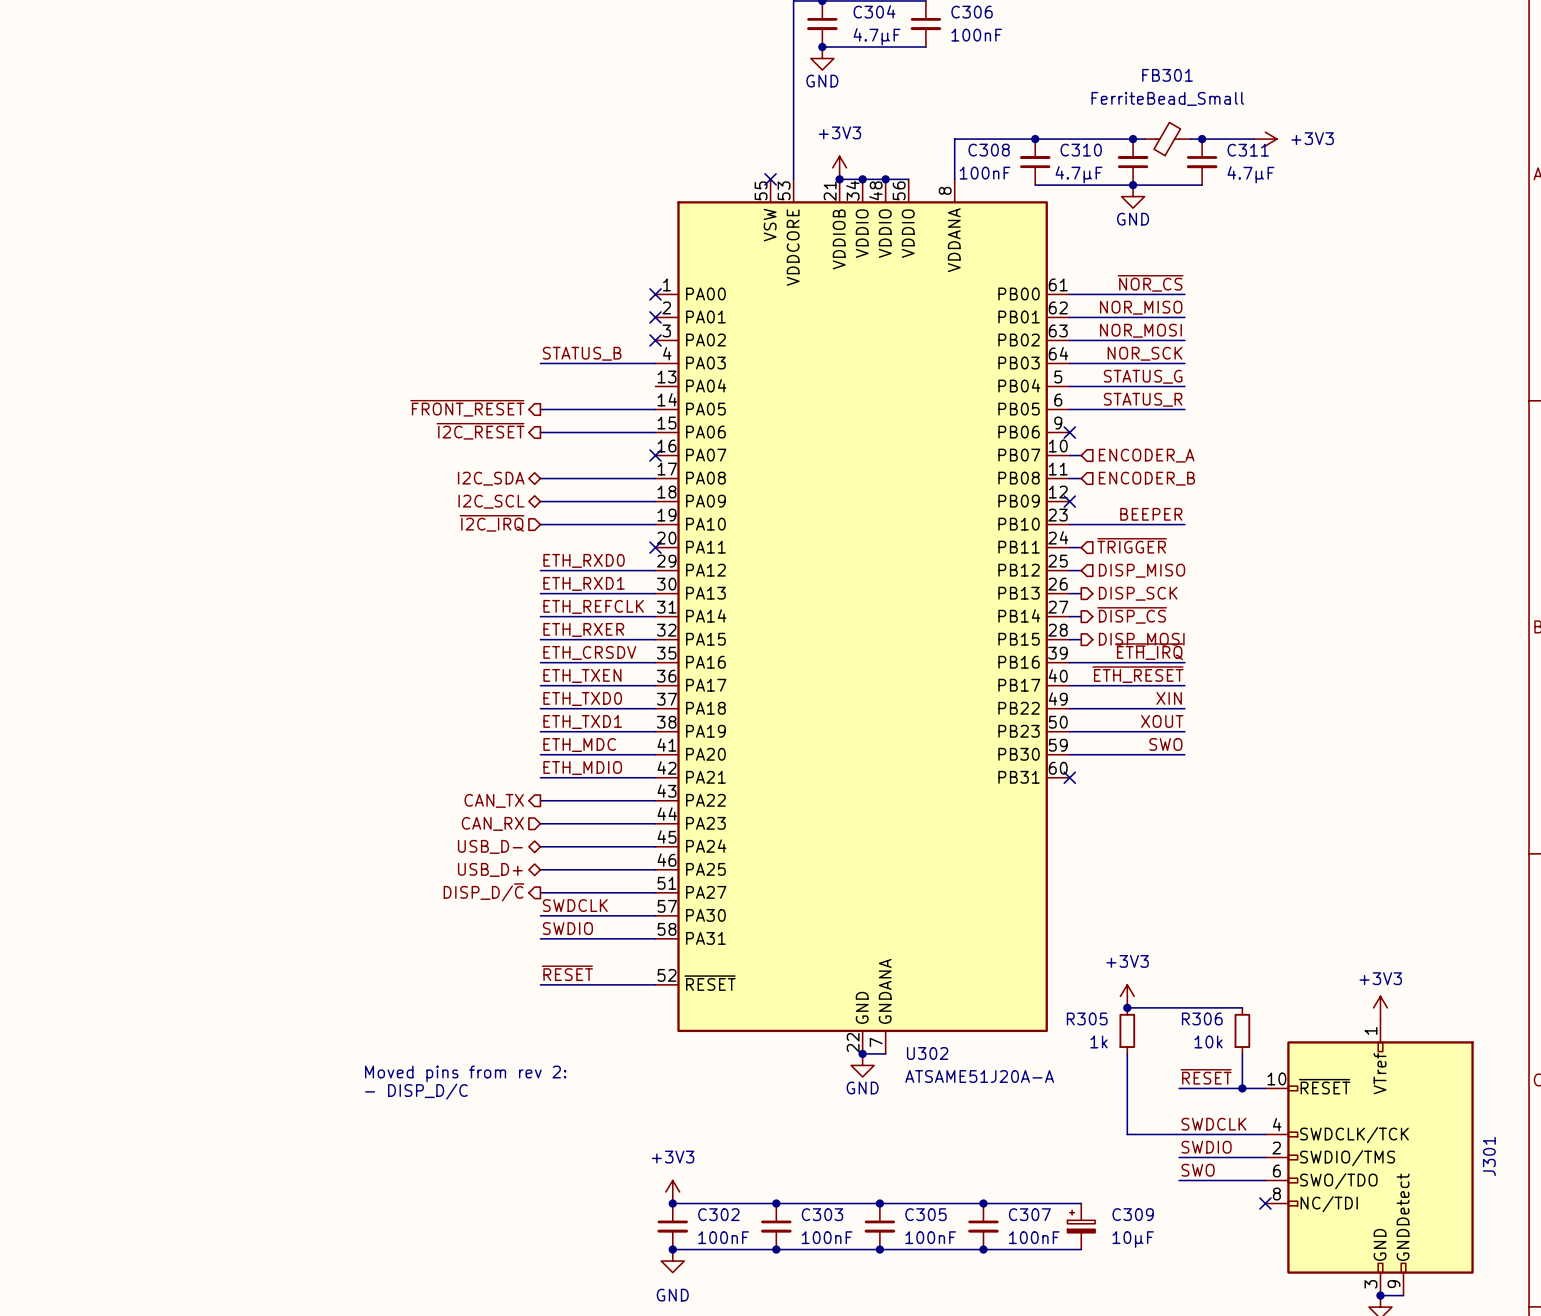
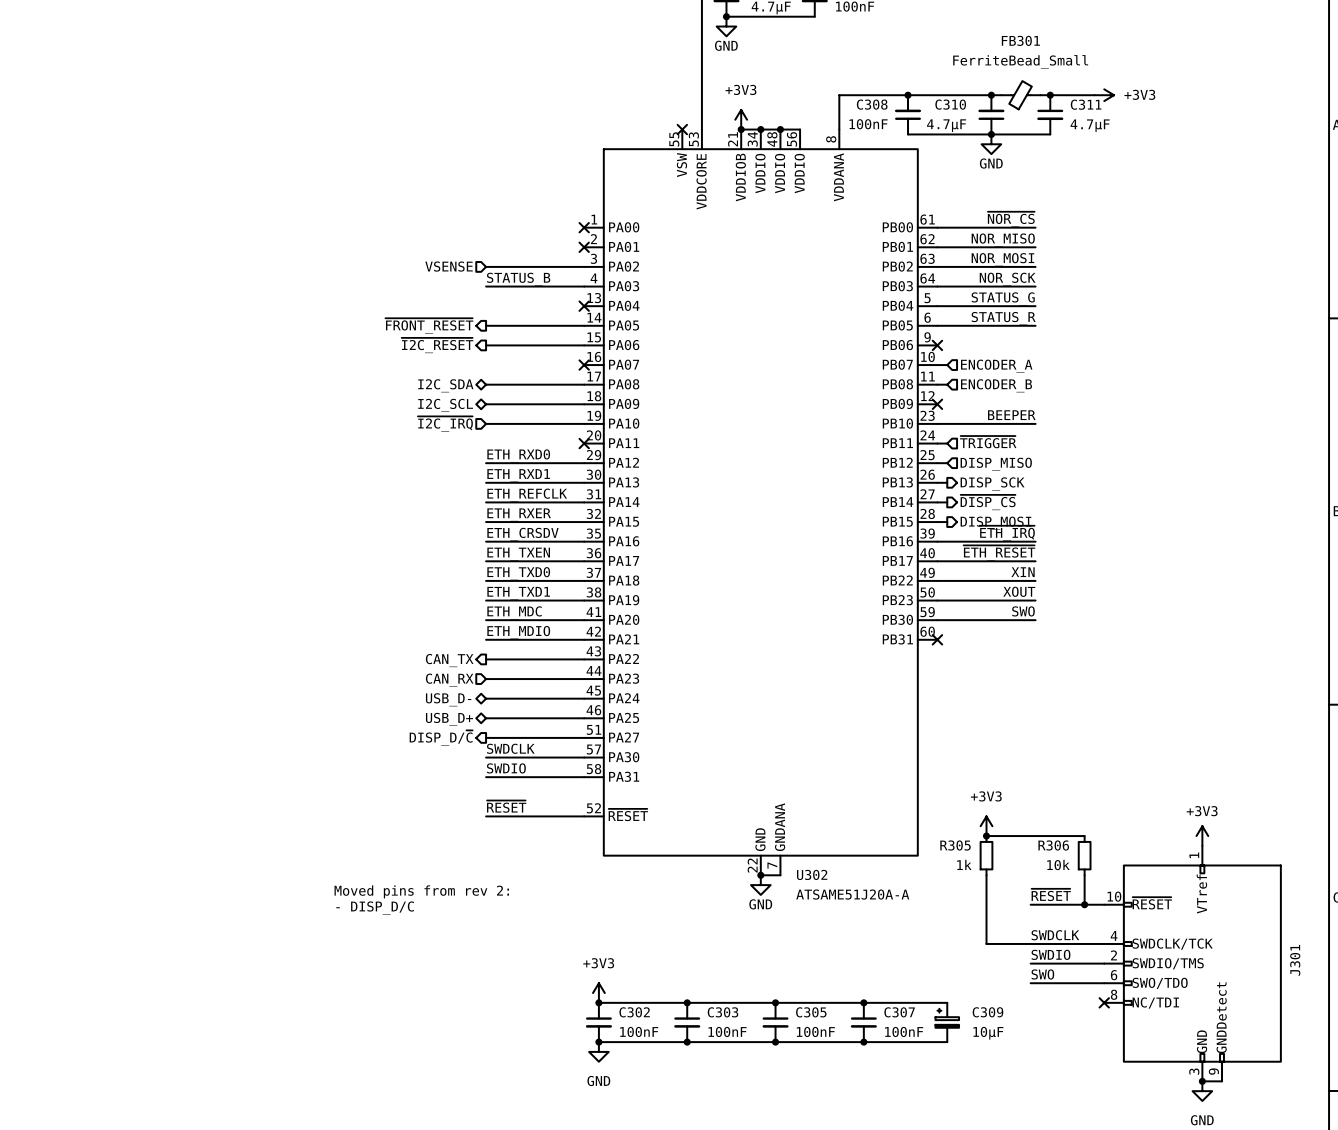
hierarchical label: none -> VSENSE (449, 266)
wire: none -> (486, 266) (584, 266)
no-connect mark position: (655, 340) -> (584, 306)

